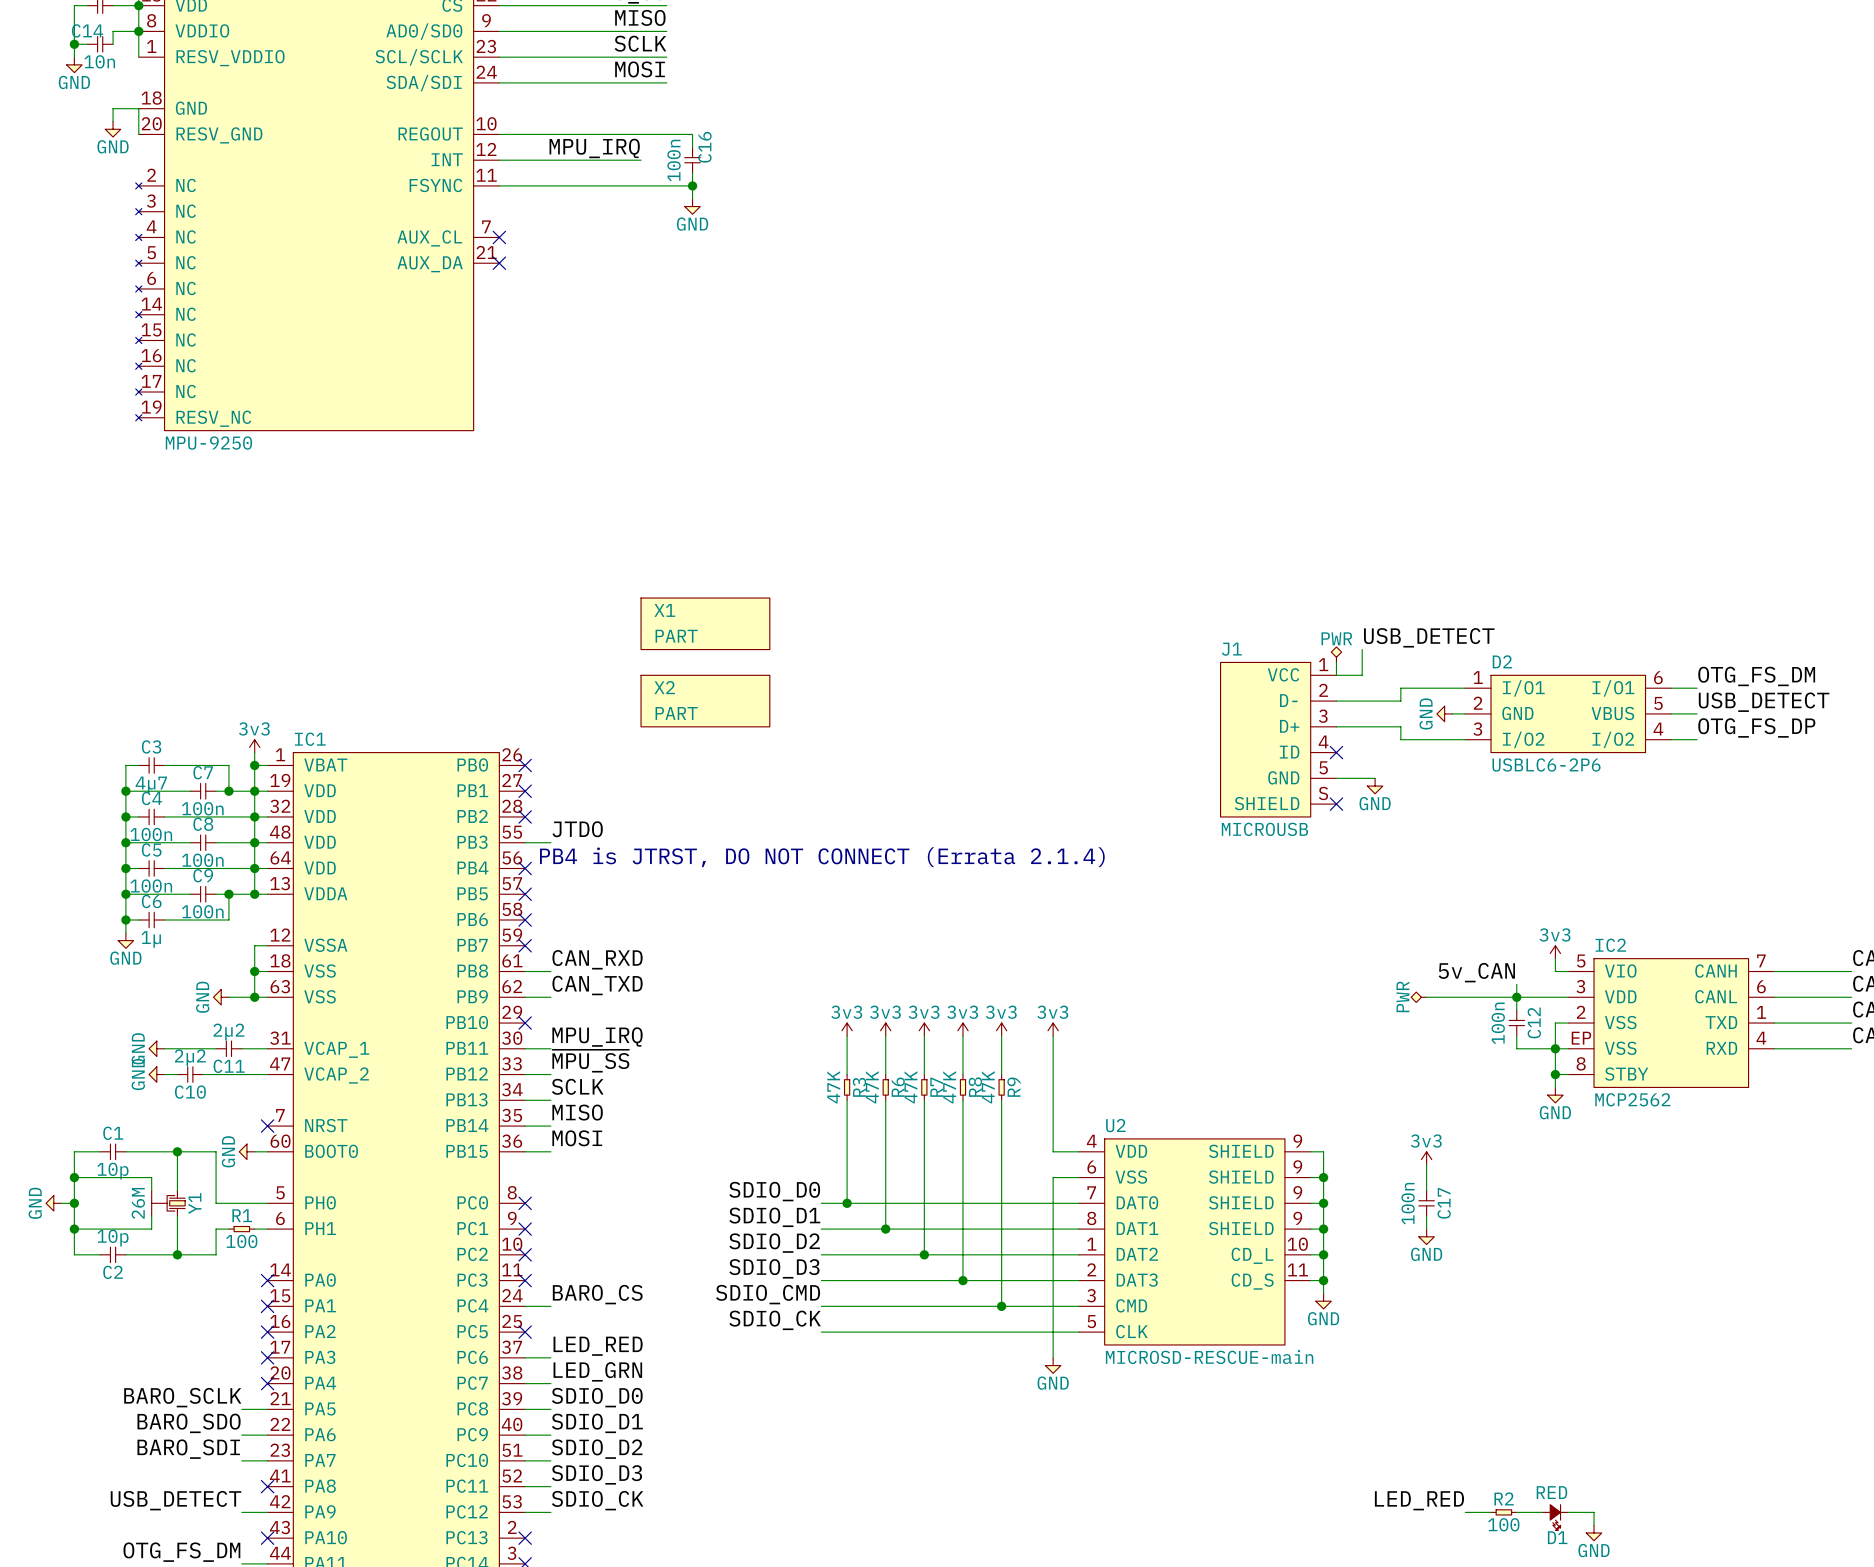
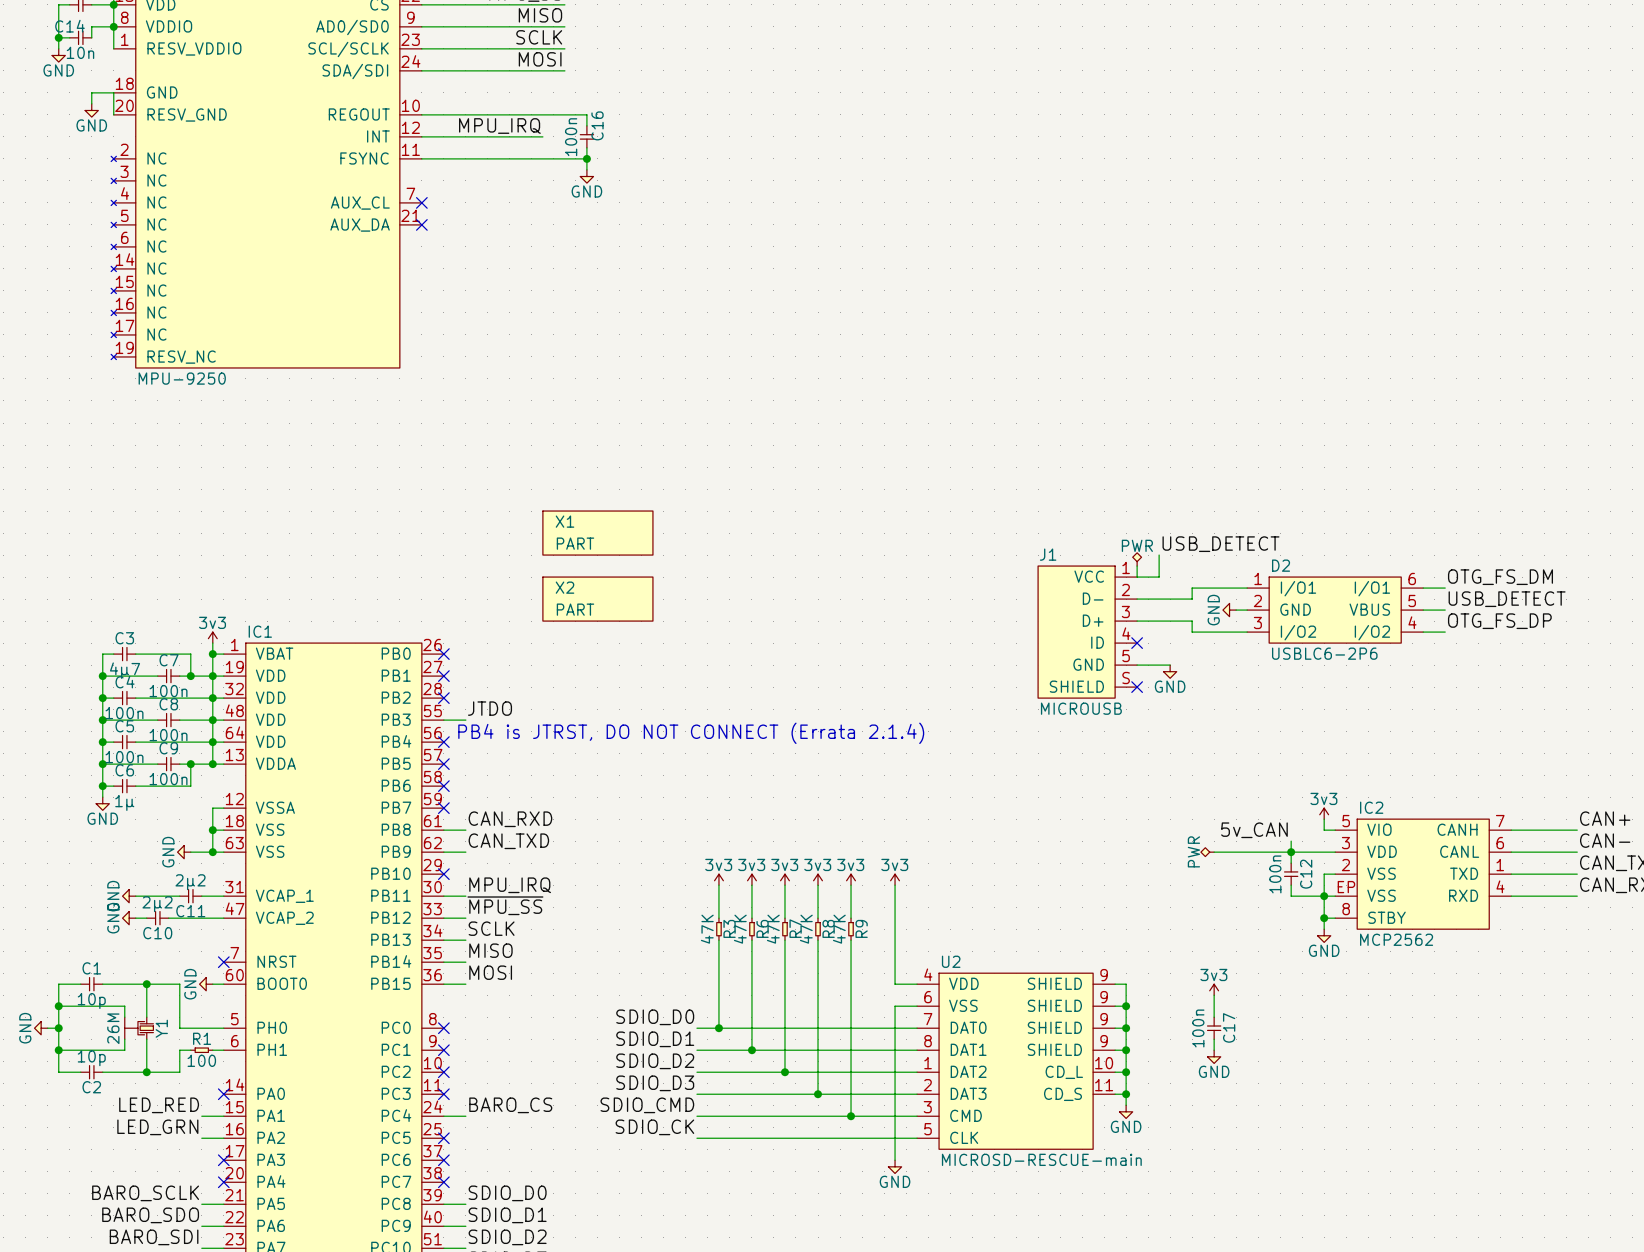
label: none -> LED_RED (159, 1105)
wire: none -> (201, 1116) (223, 1116)
no-connect mark: (267, 1306) -> none
label: none -> LED_GRN (157, 1127)
wire: none -> (201, 1138) (223, 1138)
no-connect mark: (267, 1332) -> none
label: LED_RED (598, 1346) -> none
wire: (525, 1357) (550, 1357) -> none
no-connect mark: none -> (443, 1160)
label: LED_GRN (597, 1371) -> none
wire: (525, 1383) (550, 1383) -> none
no-connect mark: none -> (443, 1182)

